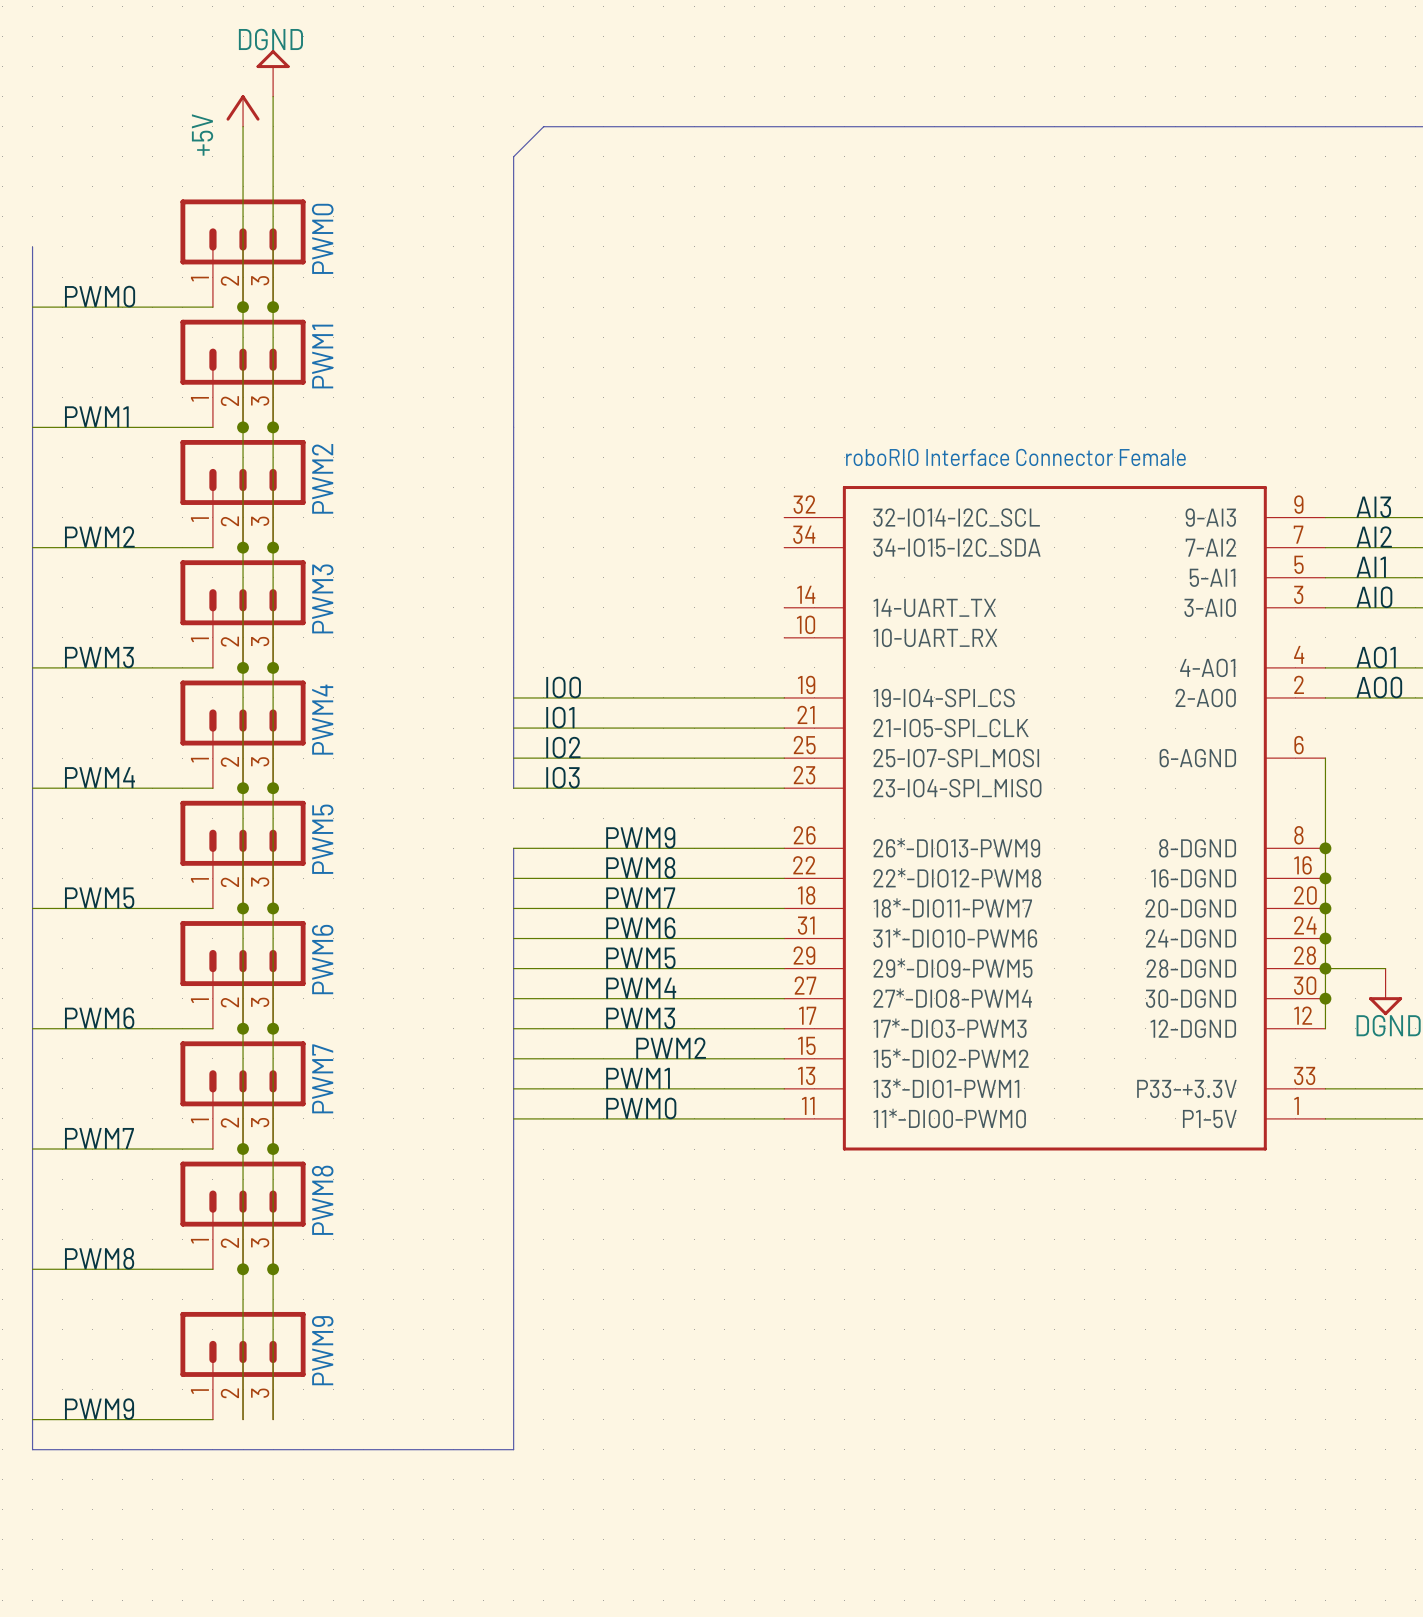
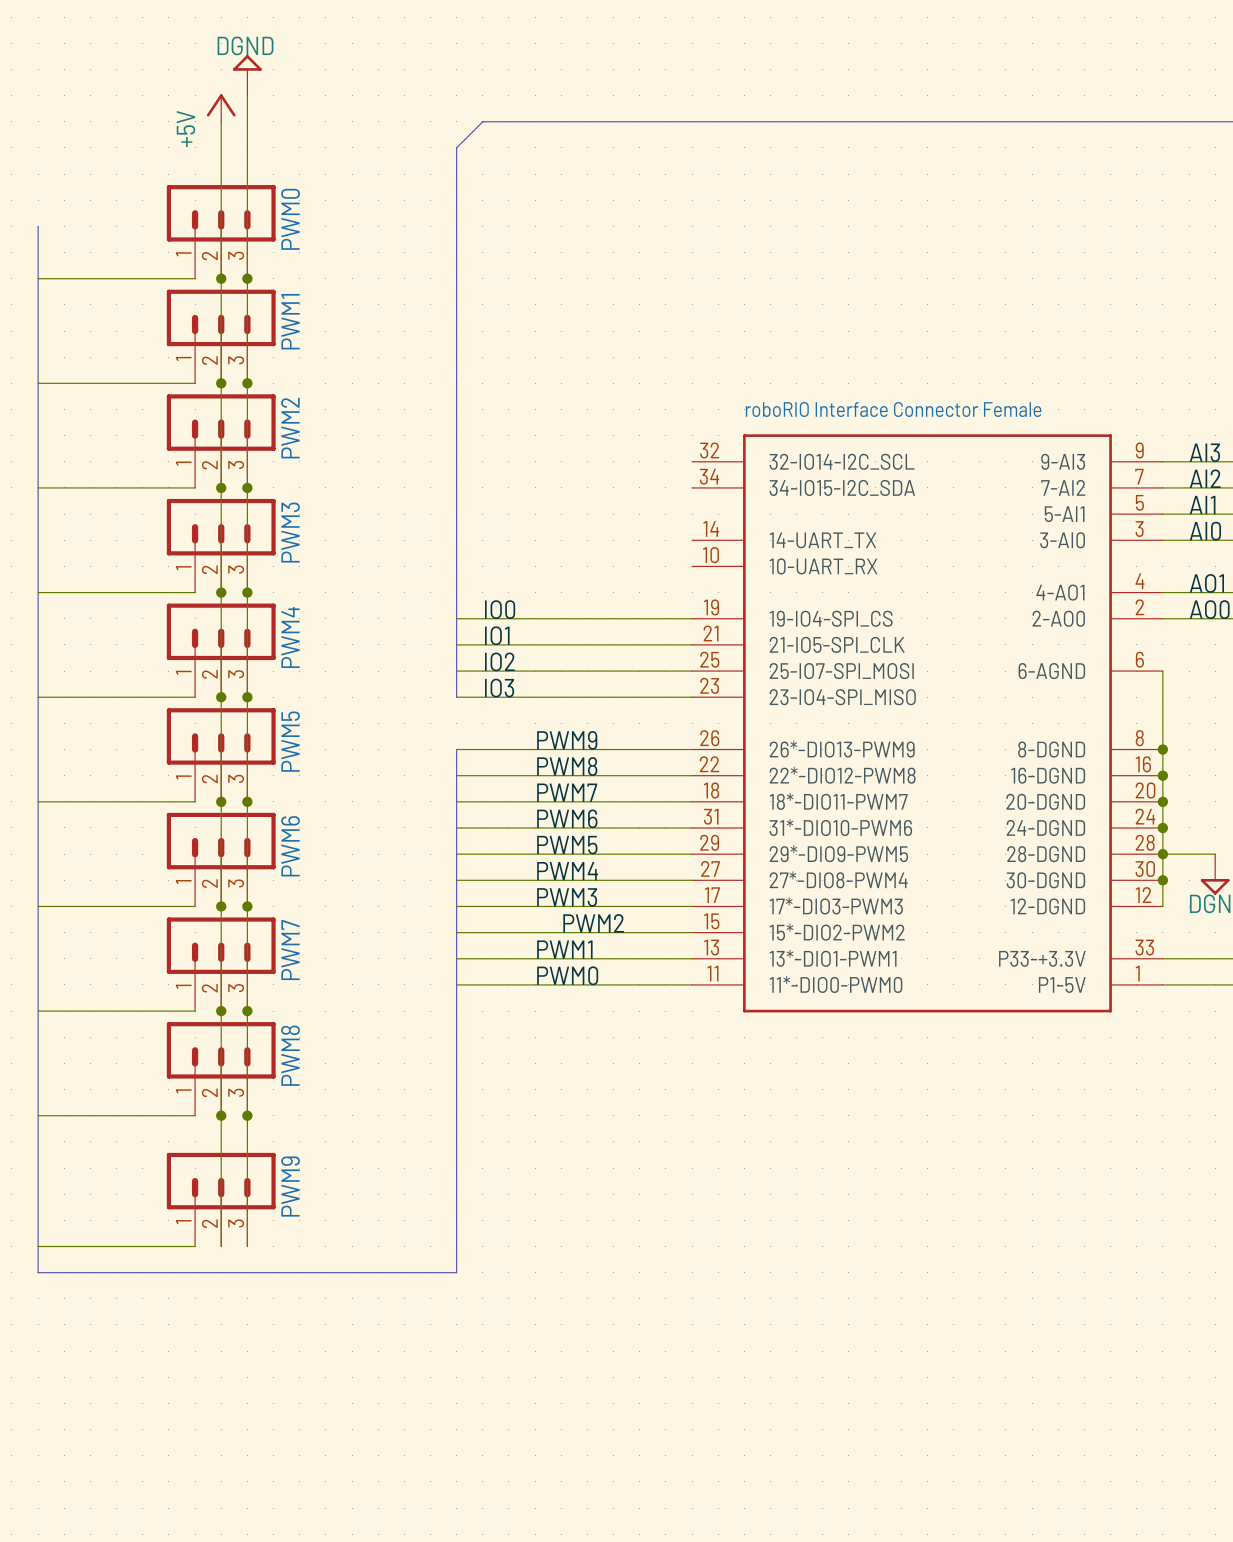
label: PWM0 (100, 296) -> none
label: PWM1 (96, 416) -> none
label: PWM2 (99, 537) -> none
label: PWM3 (99, 657) -> none
label: PWM4 (99, 777) -> none
label: PWM5 (99, 898) -> none
label: PWM6 (99, 1018) -> none
label: PWM7 (99, 1138) -> none
label: PWM8 (99, 1258) -> none
label: PWM9 (99, 1409) -> none

